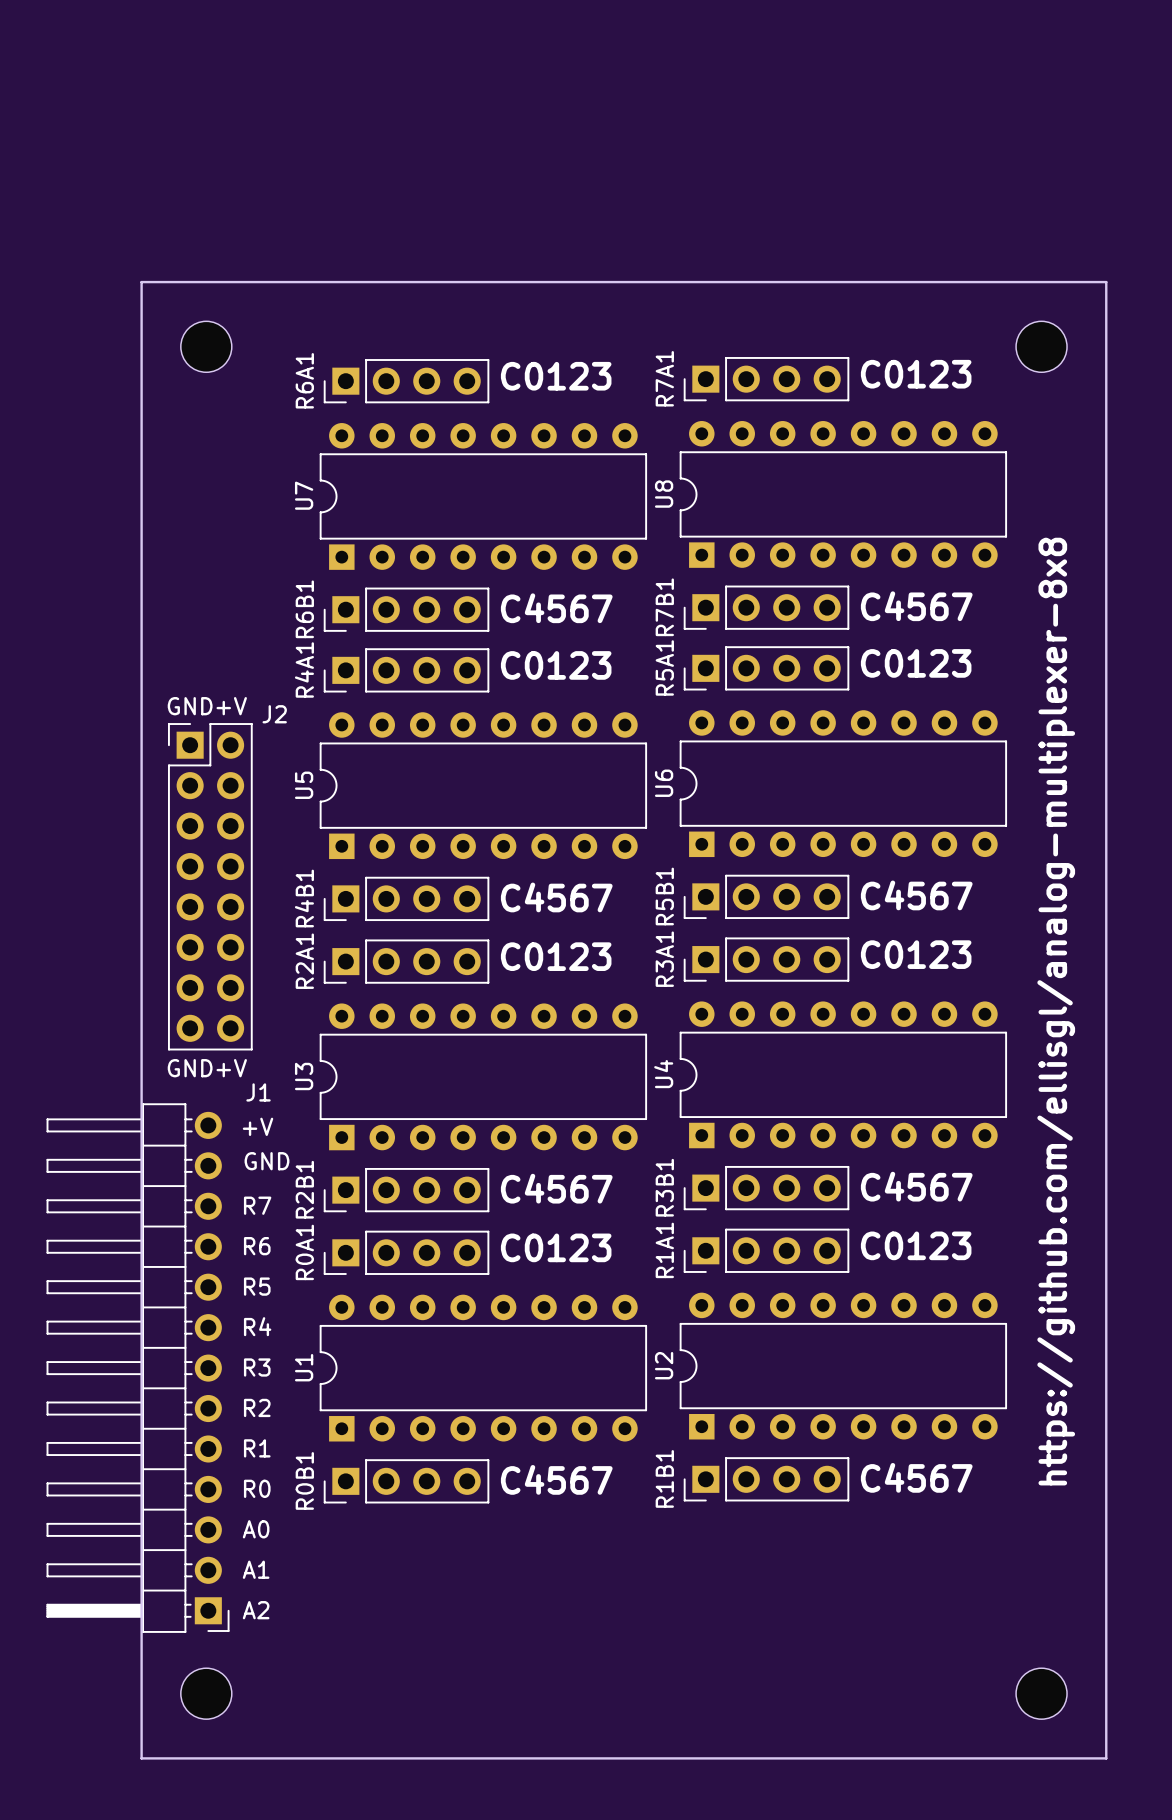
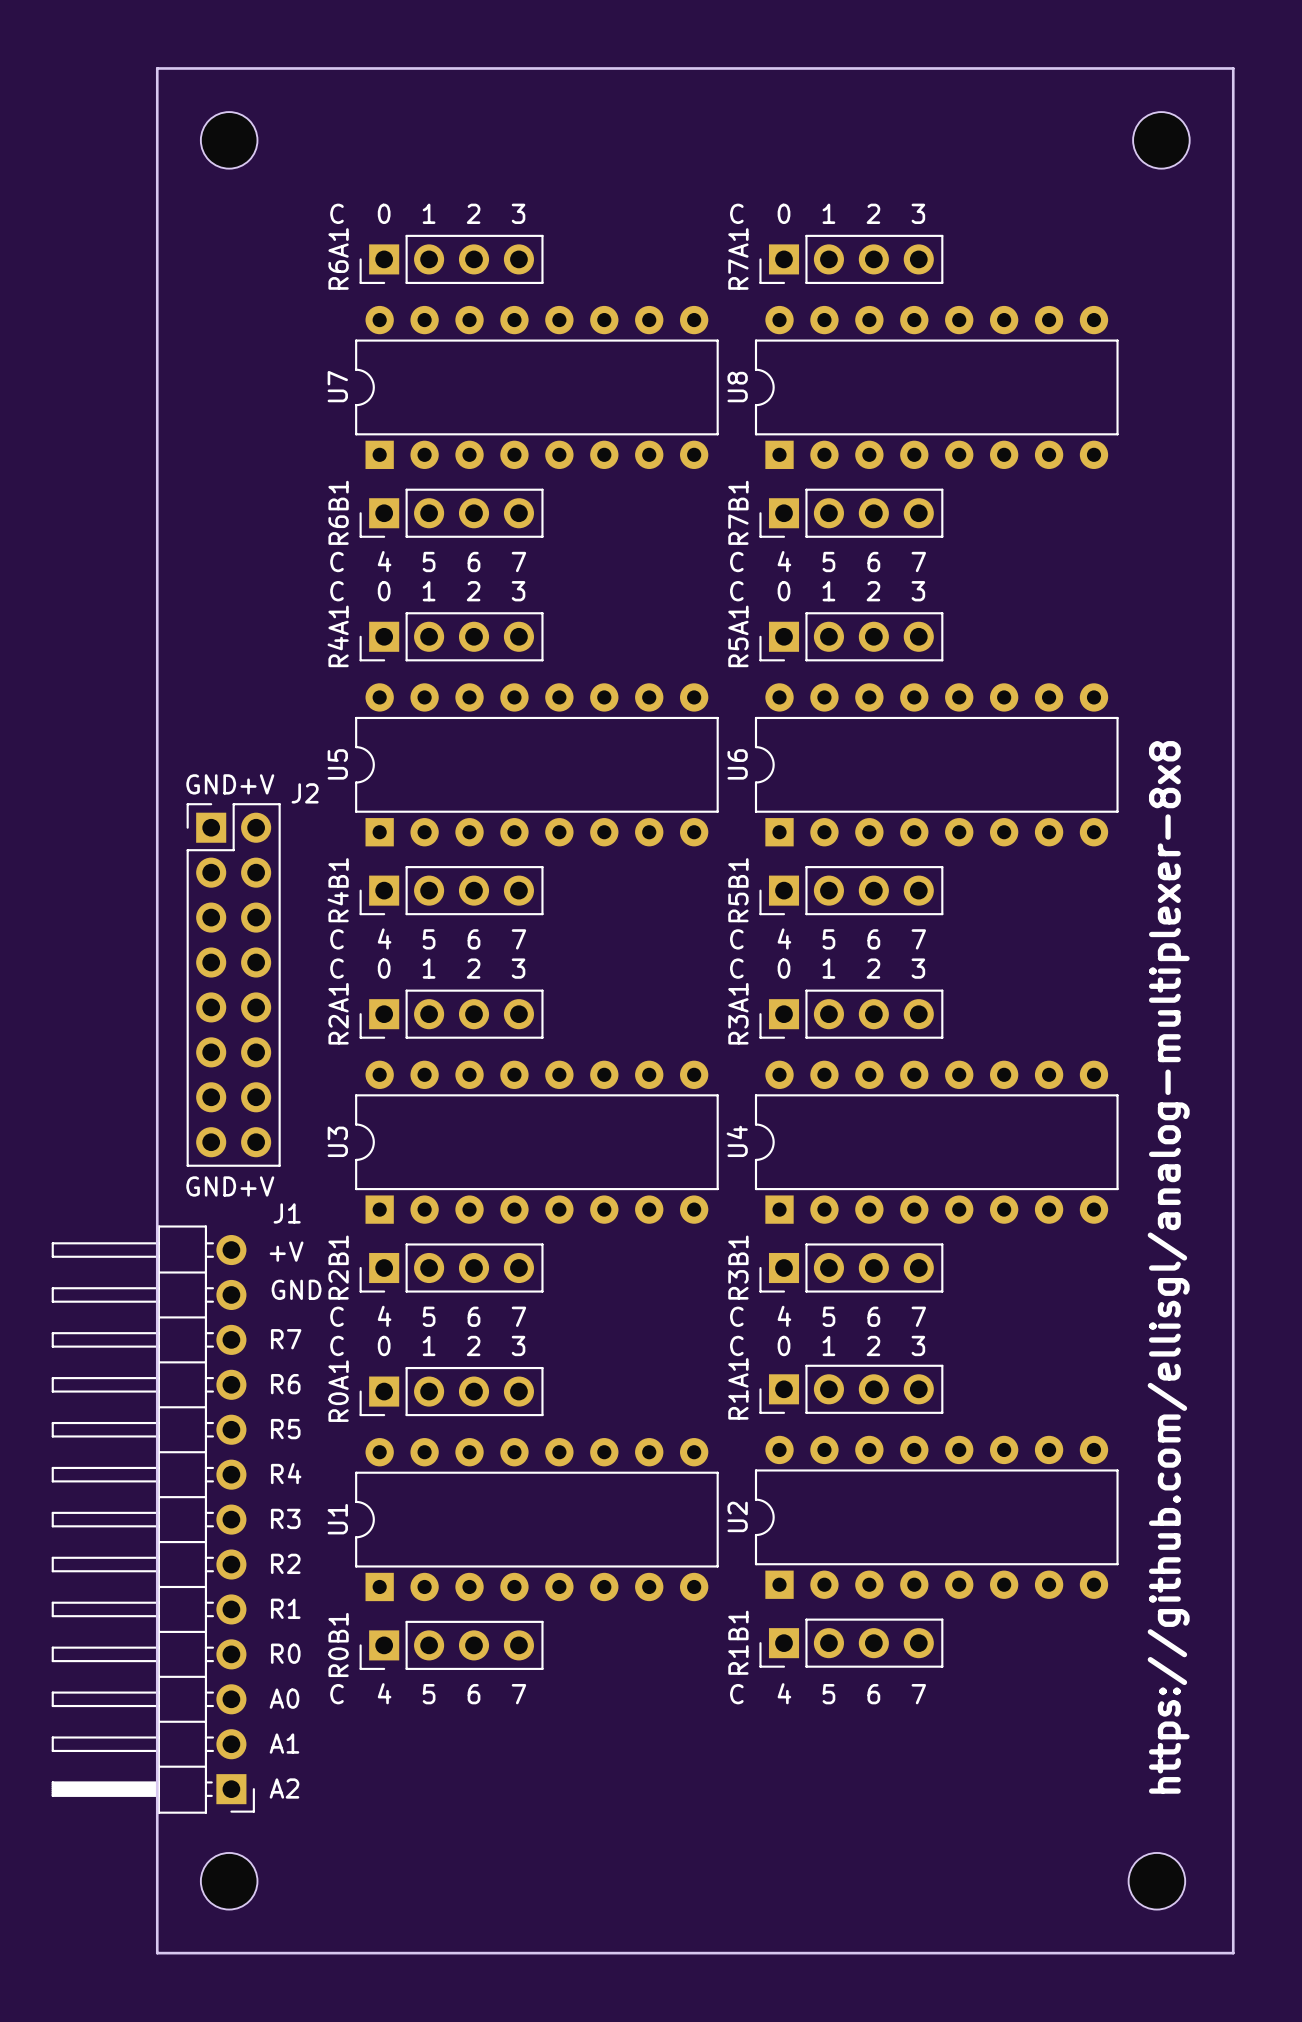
text: none -> C (336, 213)
text: none -> 0 (384, 213)
text: none -> 1 (429, 213)
text: none -> 2 (473, 213)
text: none -> 3 (518, 213)
text: none -> C (736, 213)
text: none -> 0 (784, 213)
text: none -> 1 (828, 213)
text: none -> 2 (873, 213)
text: none -> 3 (918, 213)
board edge: (141, 282) (1106, 282) (1106, 1758) -> (157, 313) (157, 68) (1233, 68) (1233, 1953) (1228, 1953)
part position: (206, 346) -> (229, 140)
part position: (1041, 346) -> (1161, 140)
text: C0123 (916, 374) -> none
text: C0123 (556, 376) -> none
R7A1 position: (766, 379) -> (851, 259)
R6A1 position: (406, 381) -> (451, 259)
U8 position: (843, 494) -> (936, 387)
U7 position: (483, 496) -> (536, 387)
text: none -> C (336, 562)
text: none -> 4 (384, 561)
text: none -> 5 (429, 562)
text: none -> 6 (474, 562)
text: none -> 7 (518, 562)
text: none -> C (736, 562)
text: none -> 4 (784, 561)
text: none -> 5 (828, 562)
text: none -> 6 (873, 562)
text: none -> 7 (918, 562)
text: none -> C (336, 591)
text: none -> 0 (384, 591)
text: none -> 1 (429, 591)
text: none -> 2 (473, 591)
text: none -> 3 (518, 591)
text: none -> C (736, 591)
text: none -> 0 (784, 591)
text: none -> 1 (828, 591)
text: none -> 2 (873, 591)
text: none -> 3 (918, 591)
text: C4567 (916, 606) -> none
R7B1 position: (766, 607) -> (851, 513)
text: C4567 (556, 608) -> none
R6B1 position: (406, 609) -> (451, 513)
text: C0123 (916, 663) -> none
text: C0123 (556, 665) -> none
R5A1 position: (766, 668) -> (851, 636)
R4A1 position: (406, 670) -> (451, 636)
U6 position: (843, 783) -> (936, 764)
U5 position: (483, 785) -> (536, 764)
text: none -> C (336, 939)
text: none -> 4 (384, 938)
text: none -> 5 (429, 939)
text: none -> 6 (474, 939)
text: none -> 7 (518, 939)
text: none -> C (736, 939)
text: none -> 4 (784, 938)
text: none -> 5 (828, 939)
text: none -> 6 (873, 939)
text: none -> 7 (918, 939)
text: none -> C (336, 968)
text: none -> 0 (384, 968)
text: none -> 1 (429, 968)
text: none -> 2 (473, 968)
text: none -> 3 (518, 968)
text: none -> C (736, 968)
text: none -> 0 (784, 968)
text: none -> 1 (828, 968)
text: none -> 2 (873, 968)
text: none -> 3 (918, 968)
text: C4567 (916, 895) -> none
R5B1 position: (766, 896) -> (851, 890)
text: C4567 (556, 897) -> none
R4B1 position: (406, 898) -> (451, 890)
text: C0123 (916, 954) -> none
text: C0123 (556, 956) -> none
R3A1 position: (766, 959) -> (851, 1014)
R2A1 position: (406, 961) -> (451, 1014)
text position: https://github.com/ellisgl/analog-multiplexer-8x8 (1056, 1011) -> https://github.com/ellisgl/analog-multiplexer-8x8 (1168, 1267)
U4 position: (843, 1074) -> (936, 1142)
U3 position: (483, 1076) -> (536, 1142)
text: none -> C (336, 1316)
text: none -> 4 (384, 1316)
text: none -> 5 (429, 1316)
text: none -> 6 (474, 1316)
text: none -> 7 (518, 1316)
text: none -> C (736, 1316)
text: none -> 4 (784, 1316)
text: none -> 5 (828, 1316)
text: none -> 6 (873, 1316)
text: none -> 7 (918, 1316)
text: C4567 (916, 1186) -> none
text: C4567 (556, 1188) -> none
R3B1 position: (766, 1188) -> (851, 1268)
R2B1 position: (406, 1190) -> (451, 1268)
text: none -> C (336, 1345)
text: none -> 0 (384, 1345)
text: none -> 1 (429, 1345)
text: none -> 2 (473, 1345)
text: none -> 3 (518, 1345)
text: none -> C (736, 1345)
text: none -> 0 (784, 1345)
text: none -> 1 (828, 1345)
text: none -> 2 (873, 1345)
text: none -> 3 (918, 1345)
text: C0123 (916, 1245) -> none
text: C0123 (556, 1247) -> none
text: C4567 (916, 1477) -> none
text: C4567 (556, 1479) -> none
text: none -> 4 (384, 1693)
text: none -> 4 (784, 1693)
text: none -> C (336, 1694)
text: none -> 5 (429, 1694)
text: none -> 6 (474, 1694)
text: none -> 7 (518, 1694)
text: none -> C (736, 1694)
text: none -> 5 (828, 1694)
text: none -> 6 (873, 1694)
text: none -> 7 (918, 1694)

